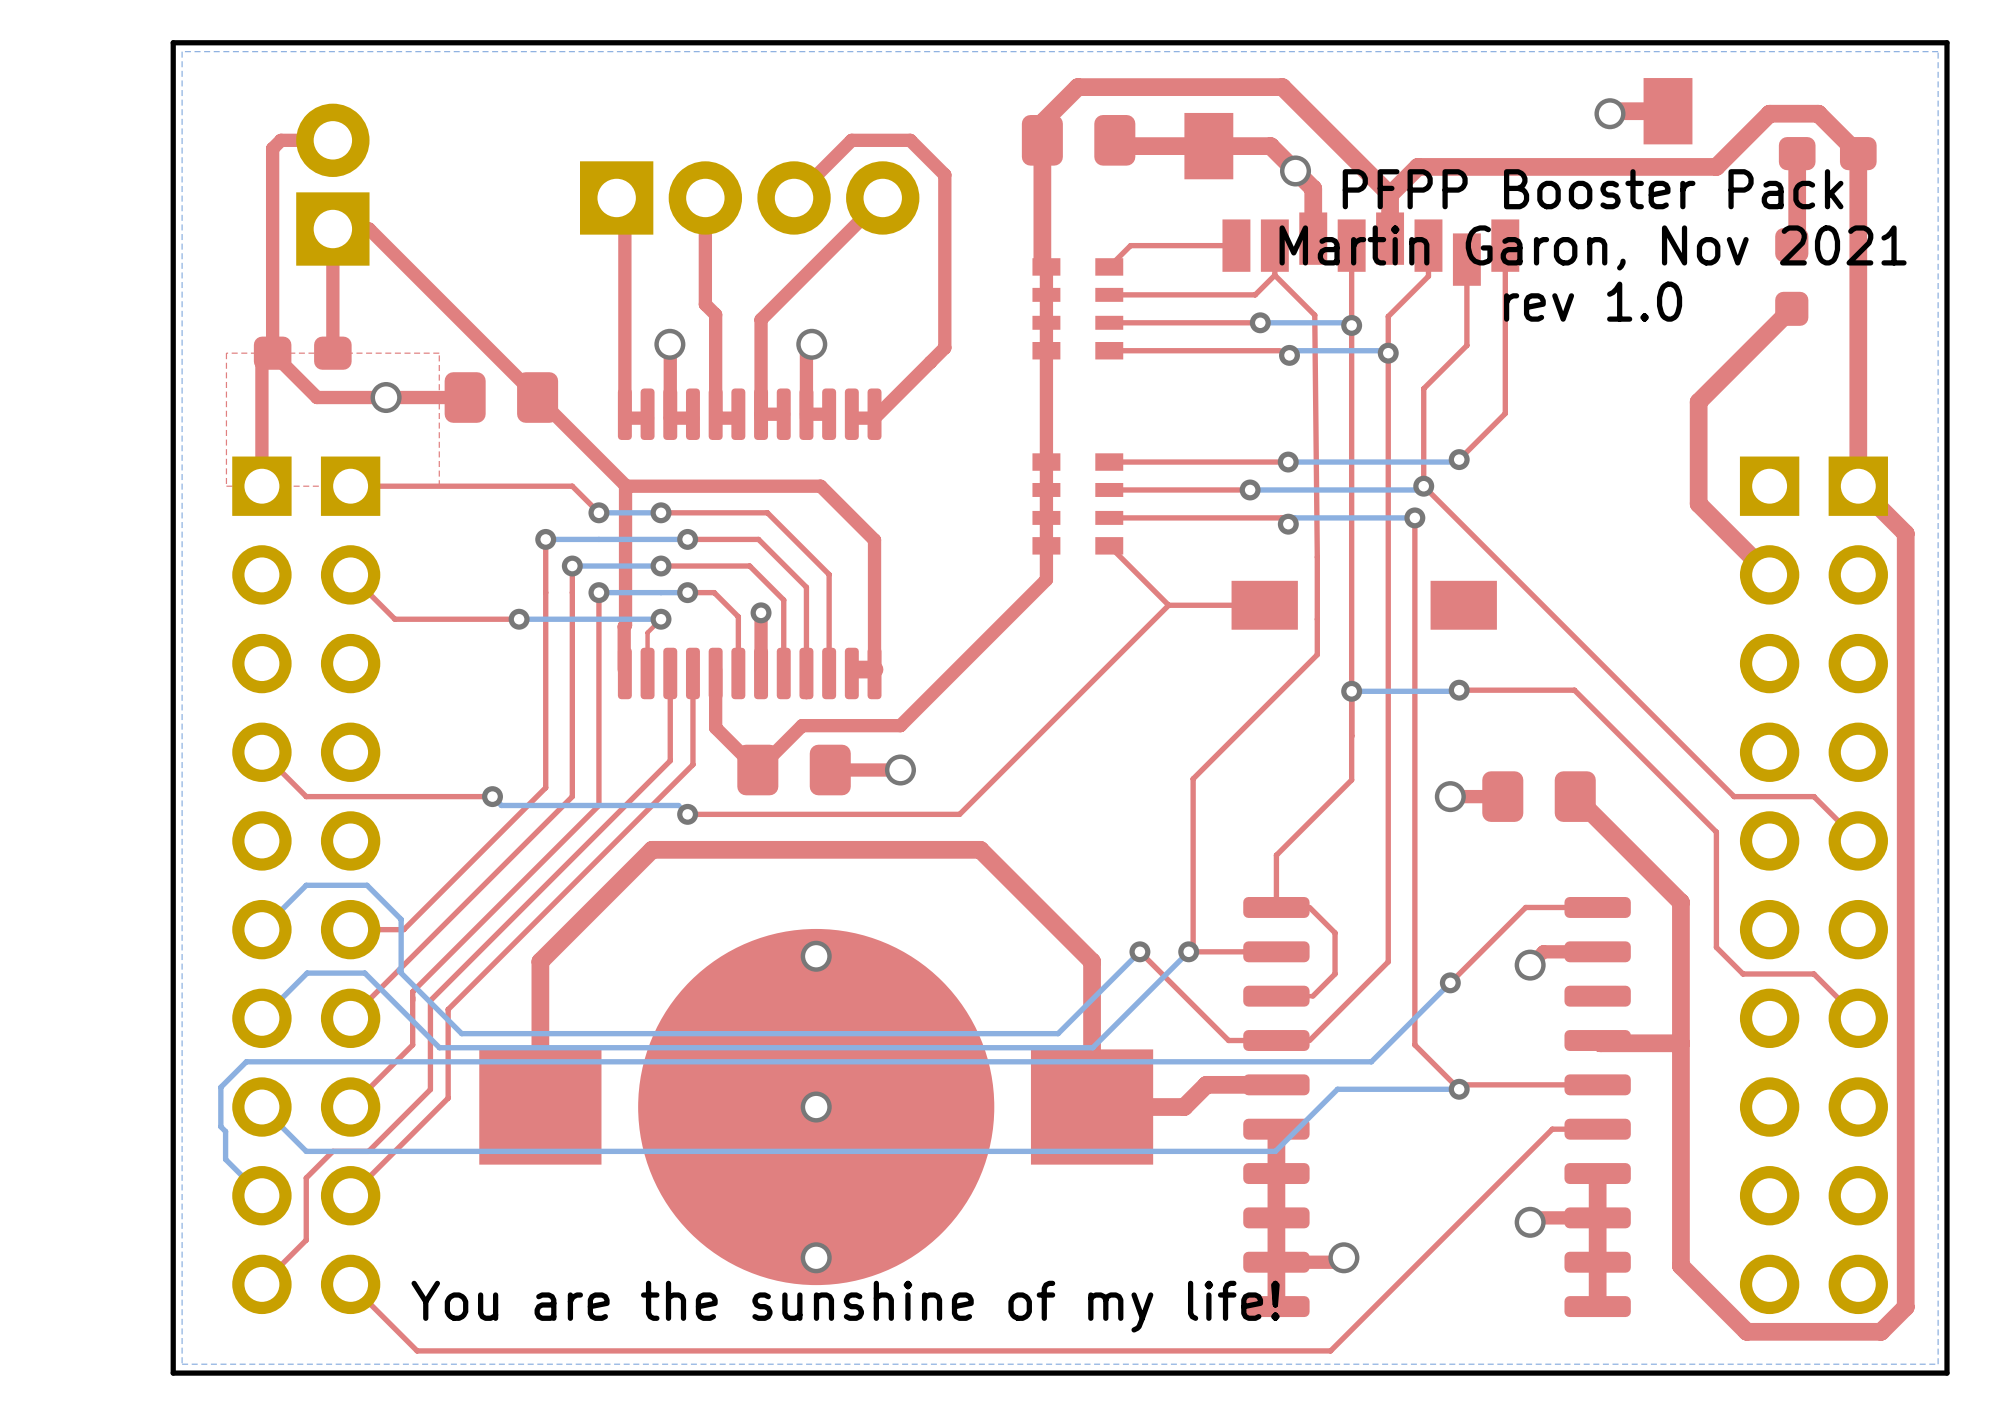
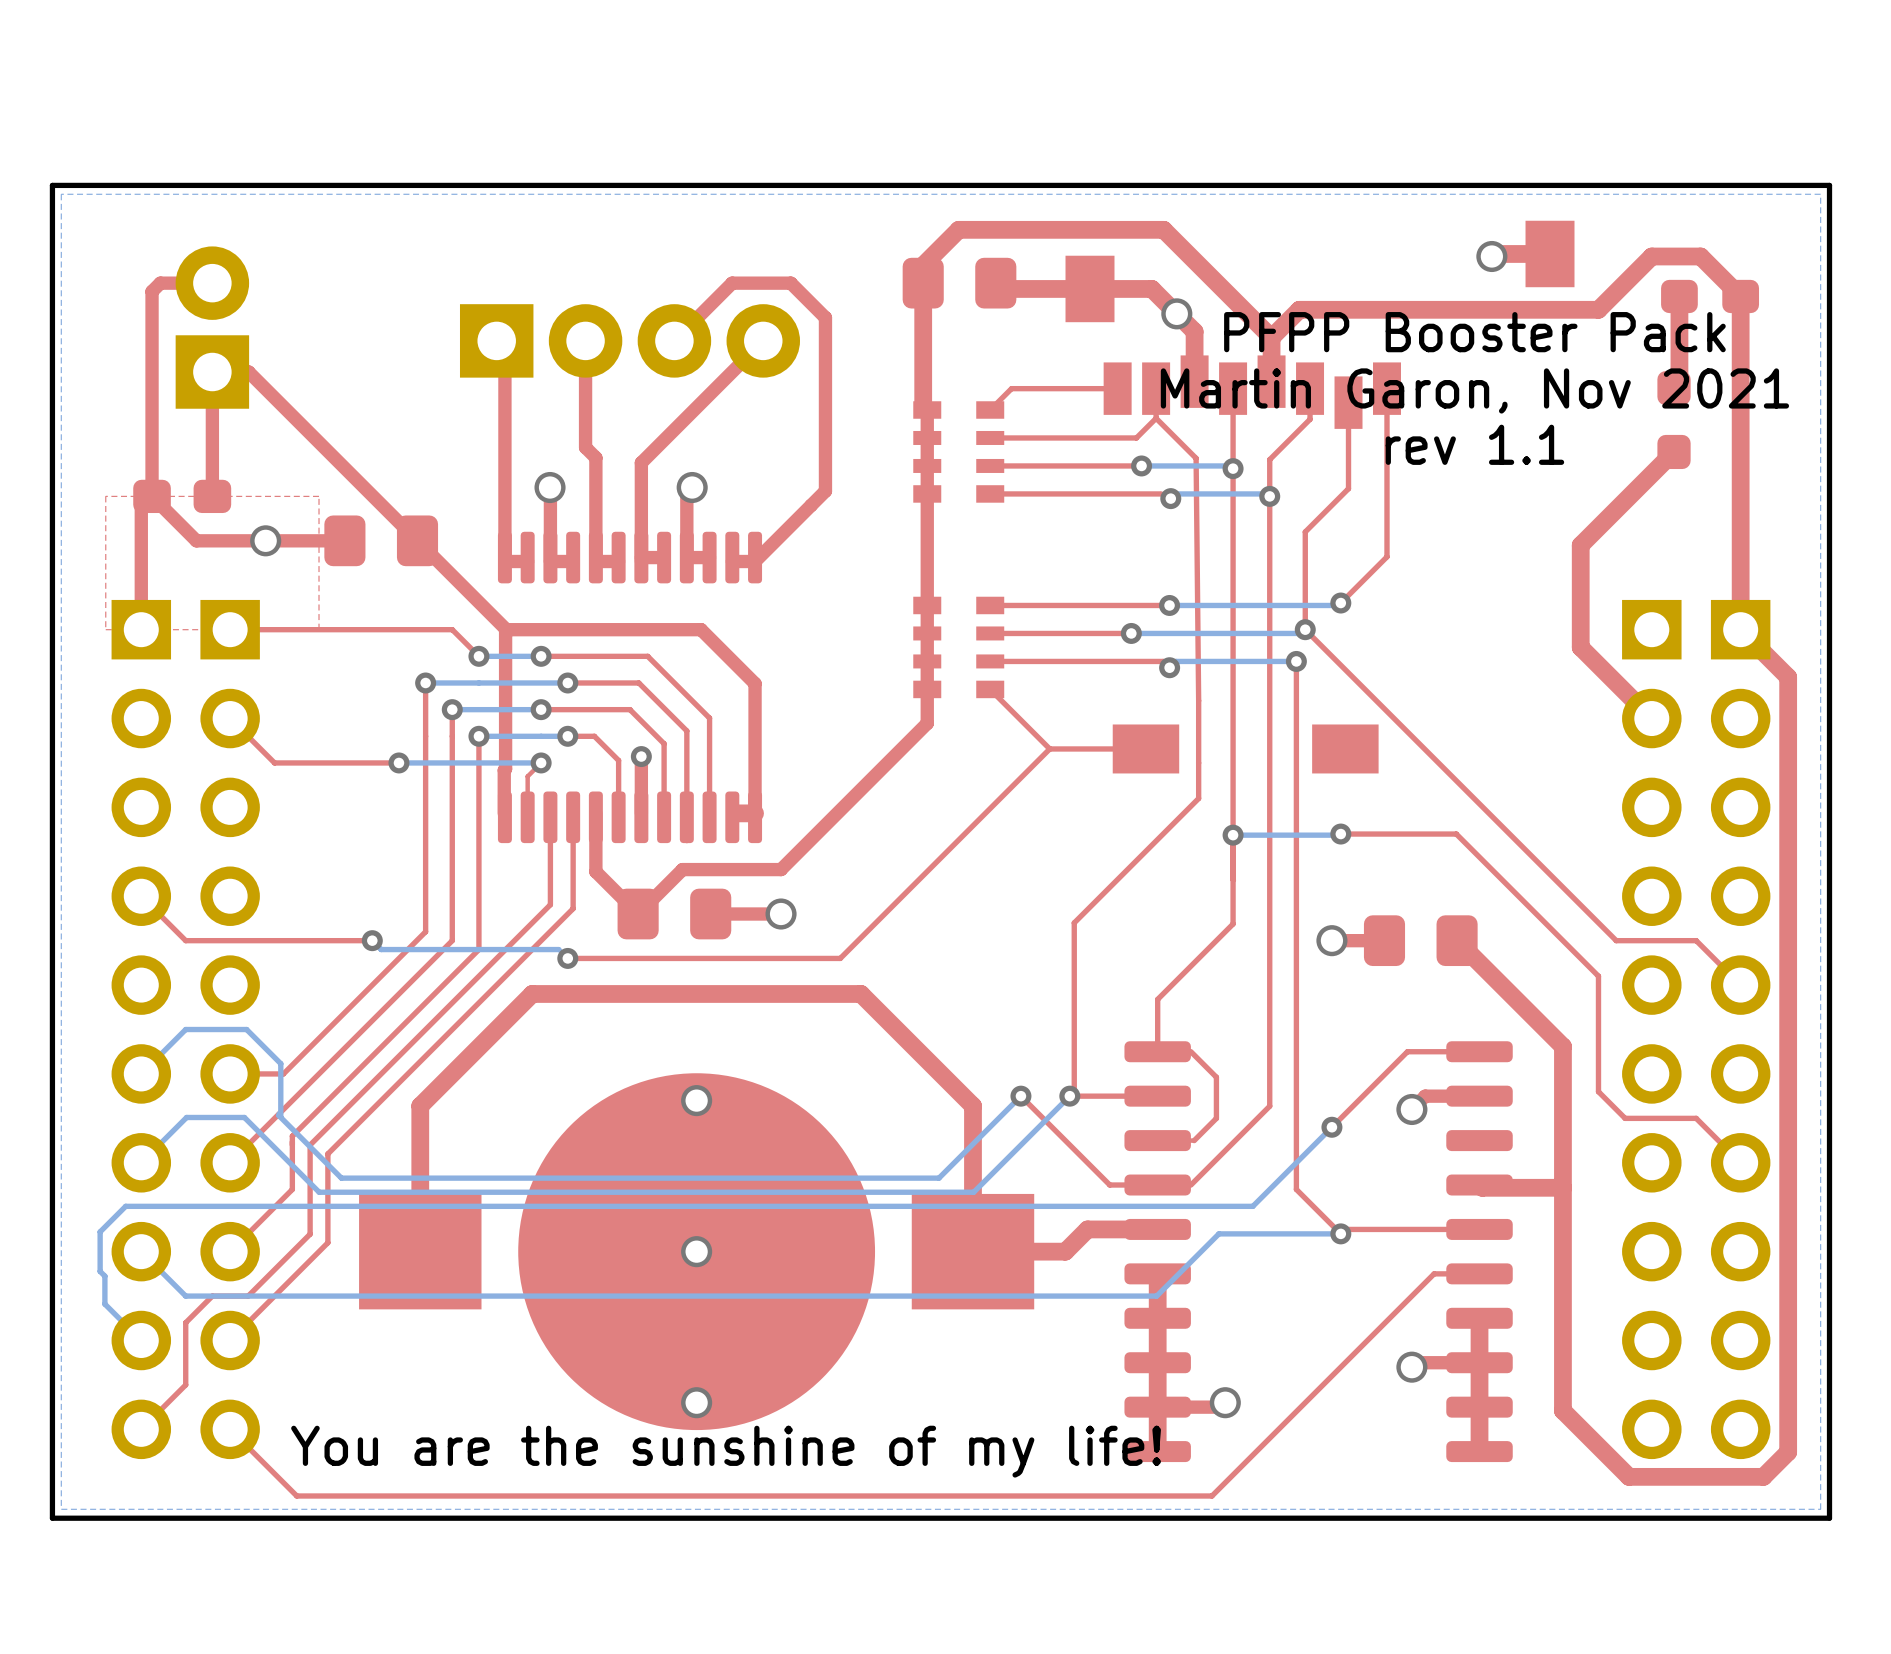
text: rev 1.0 (1593, 301) -> rev 1.1 (1474, 444)

